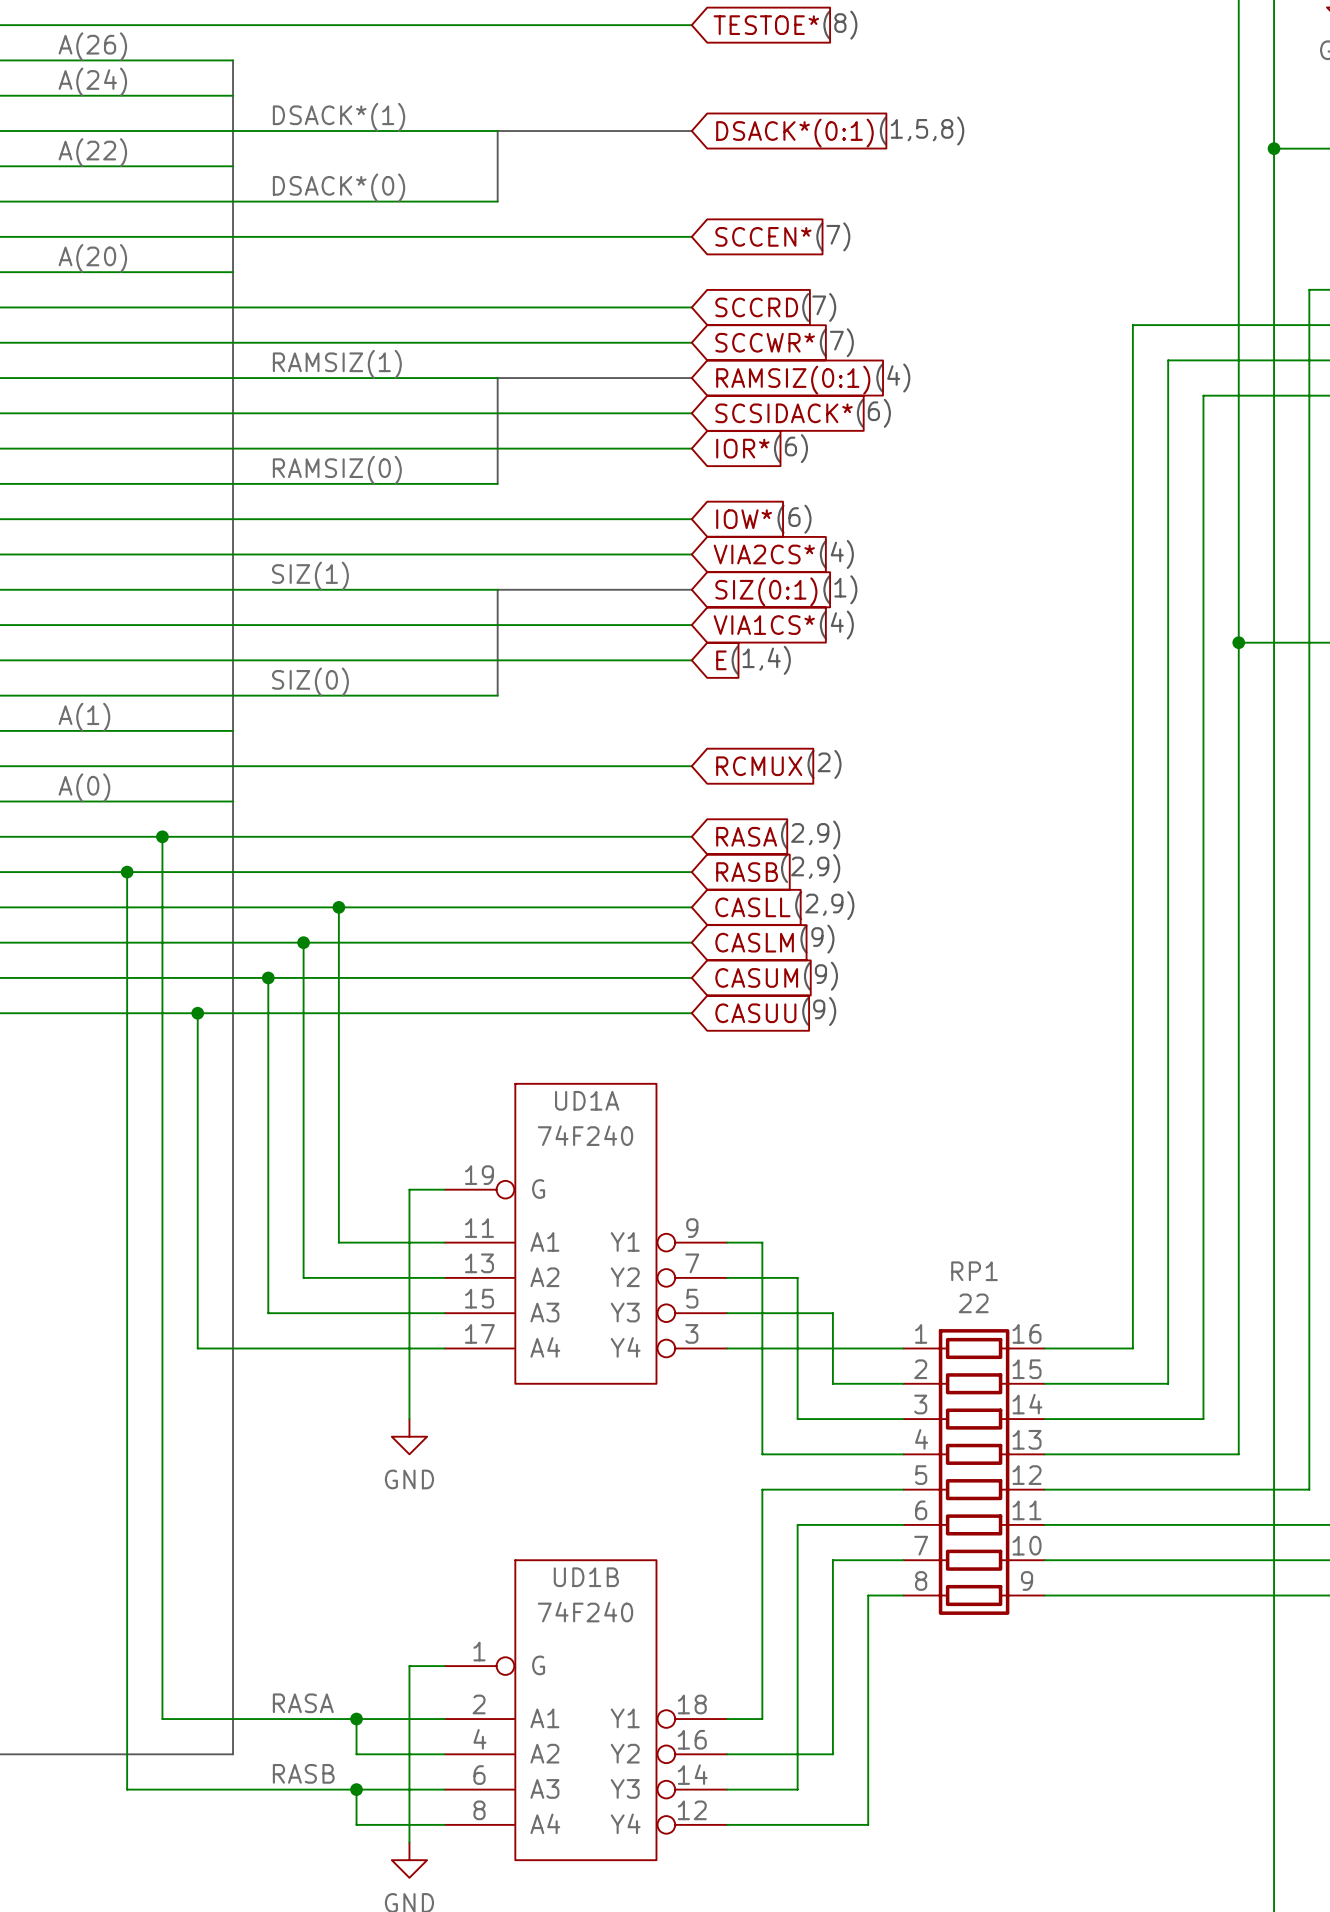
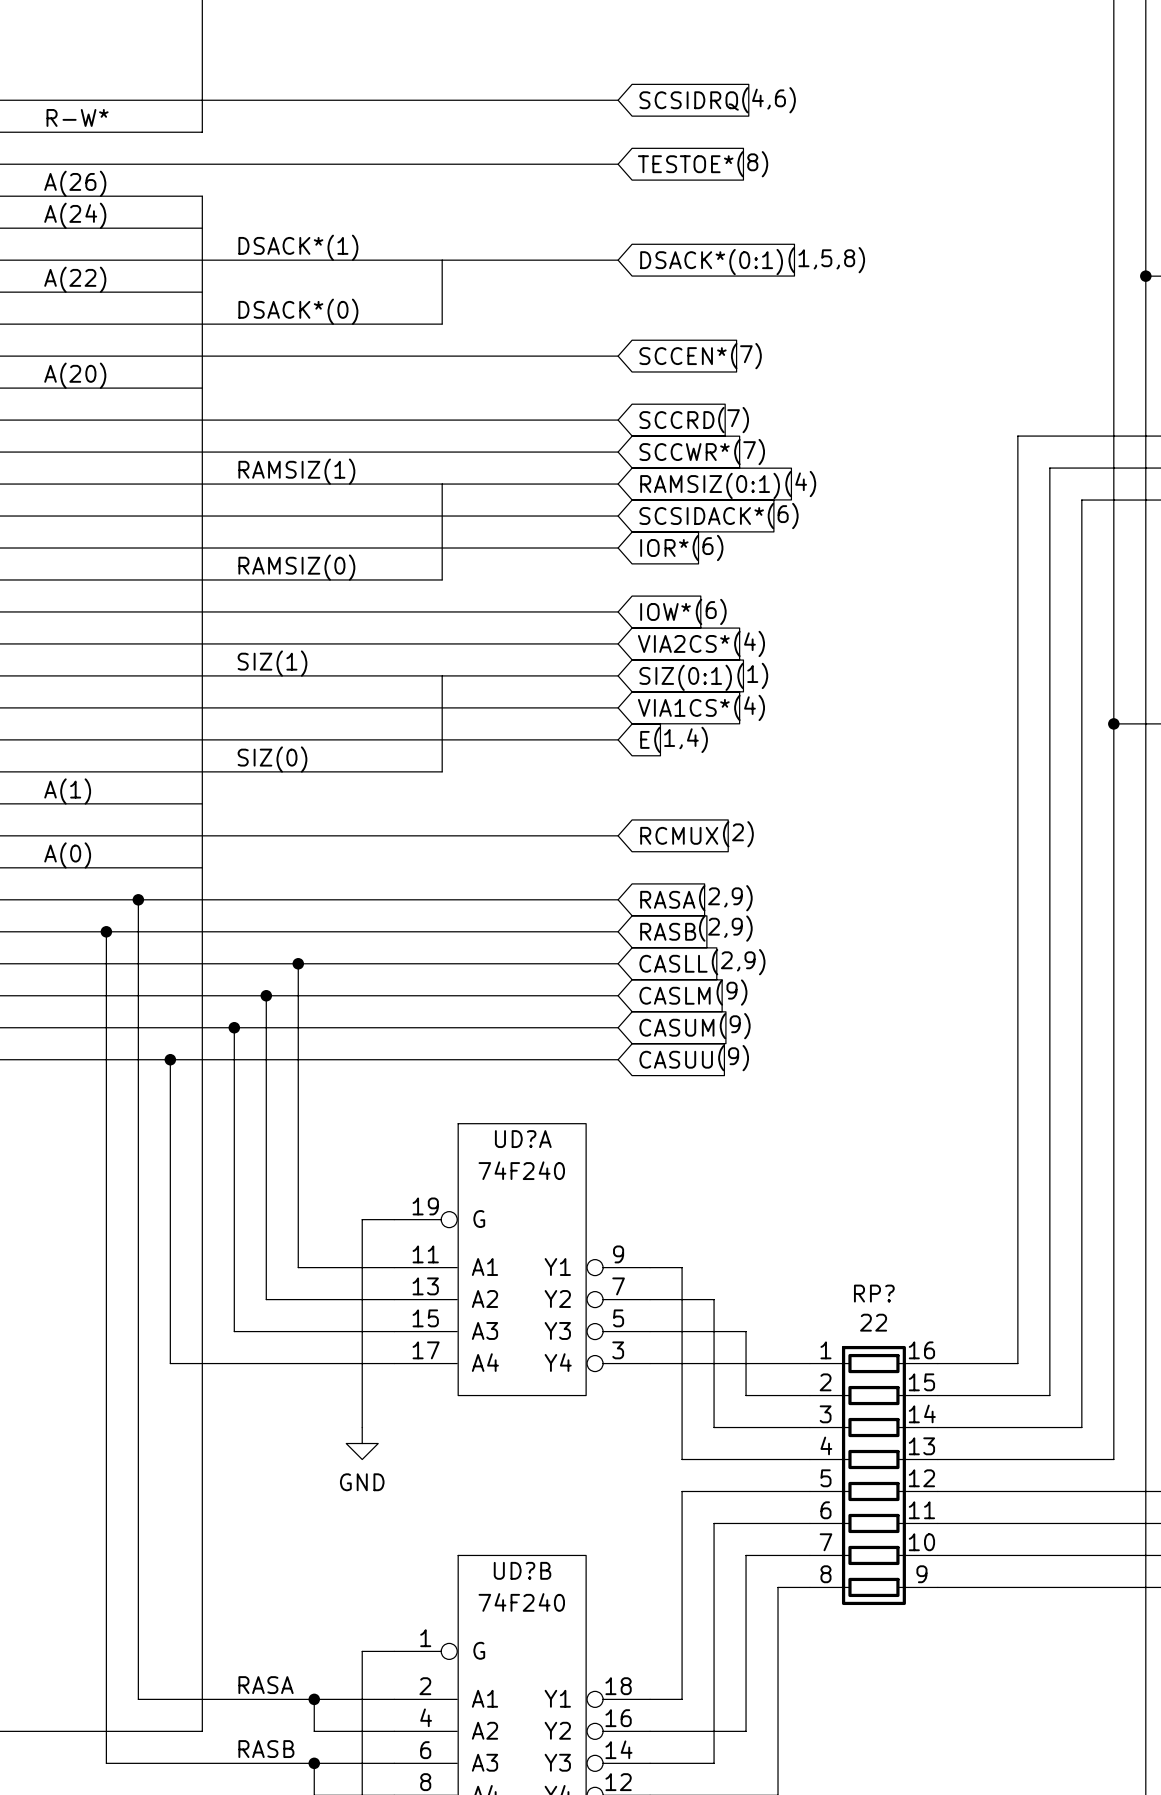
UD1A name: UD1A (587, 1100) -> UD?A (523, 1139)
RP1 name: RP1 (974, 1271) -> RP? (874, 1293)
UD1B name: UD1B (586, 1577) -> UD?B (522, 1570)

